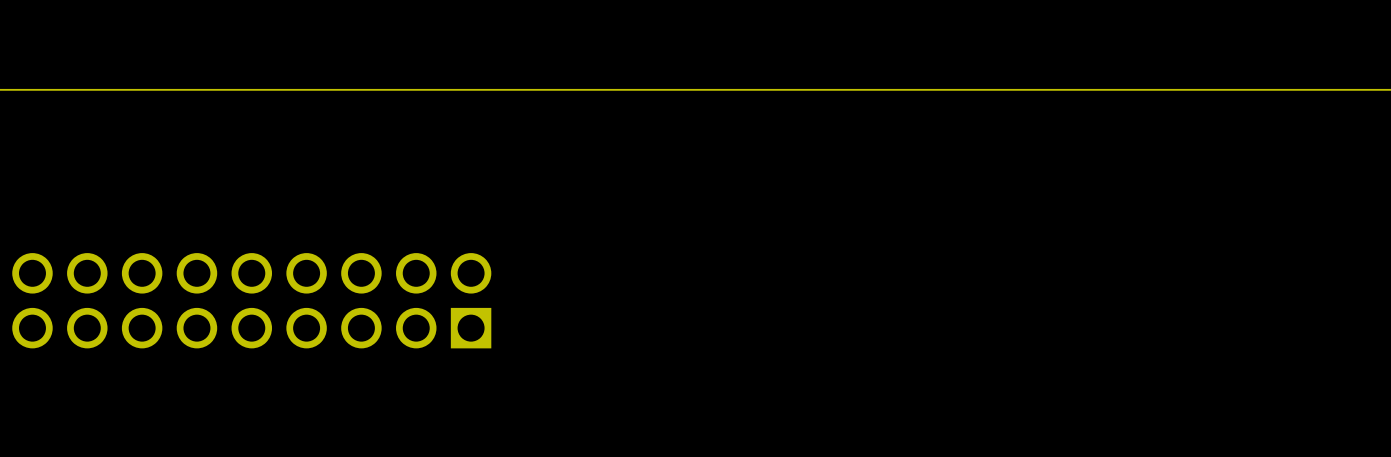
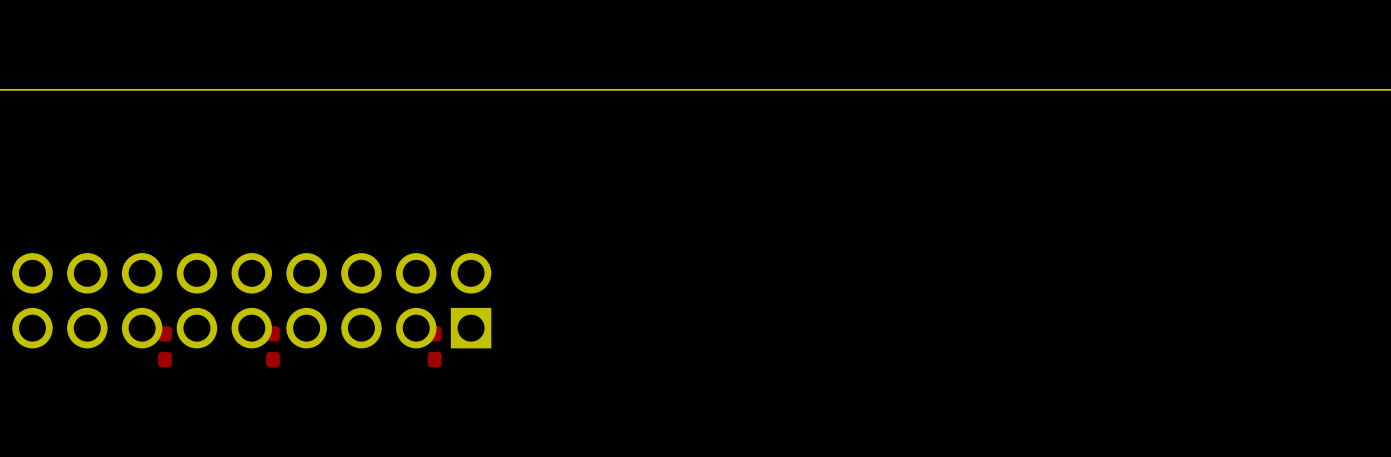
part: none -> (165, 346)
part: none -> (272, 346)
part: none -> (434, 346)

